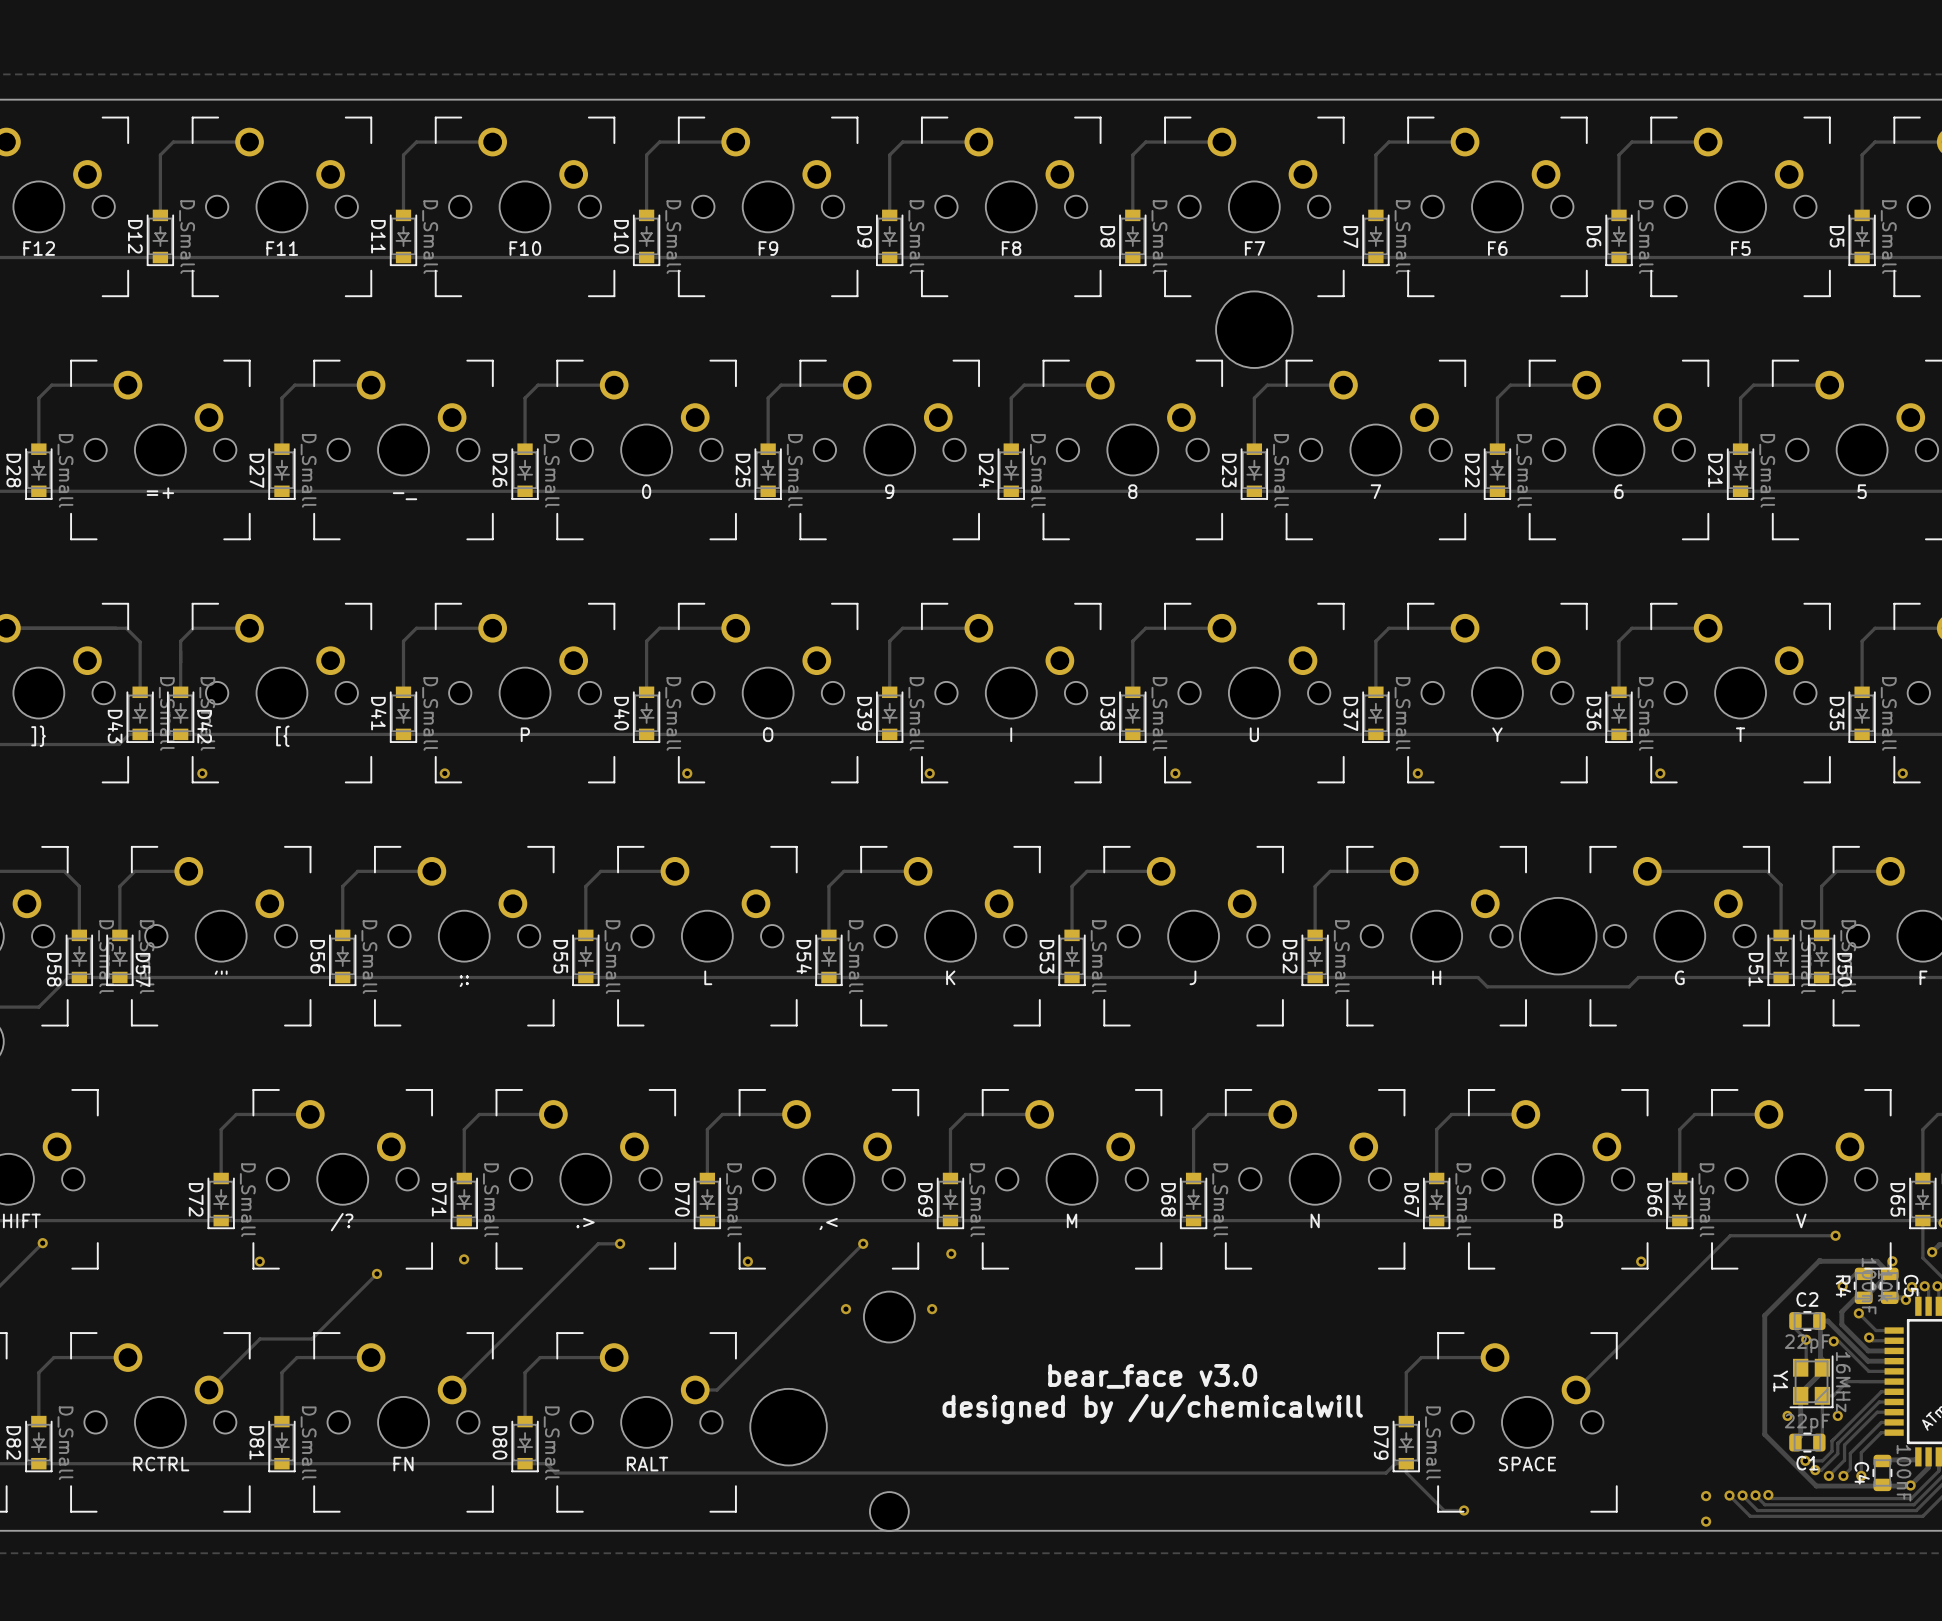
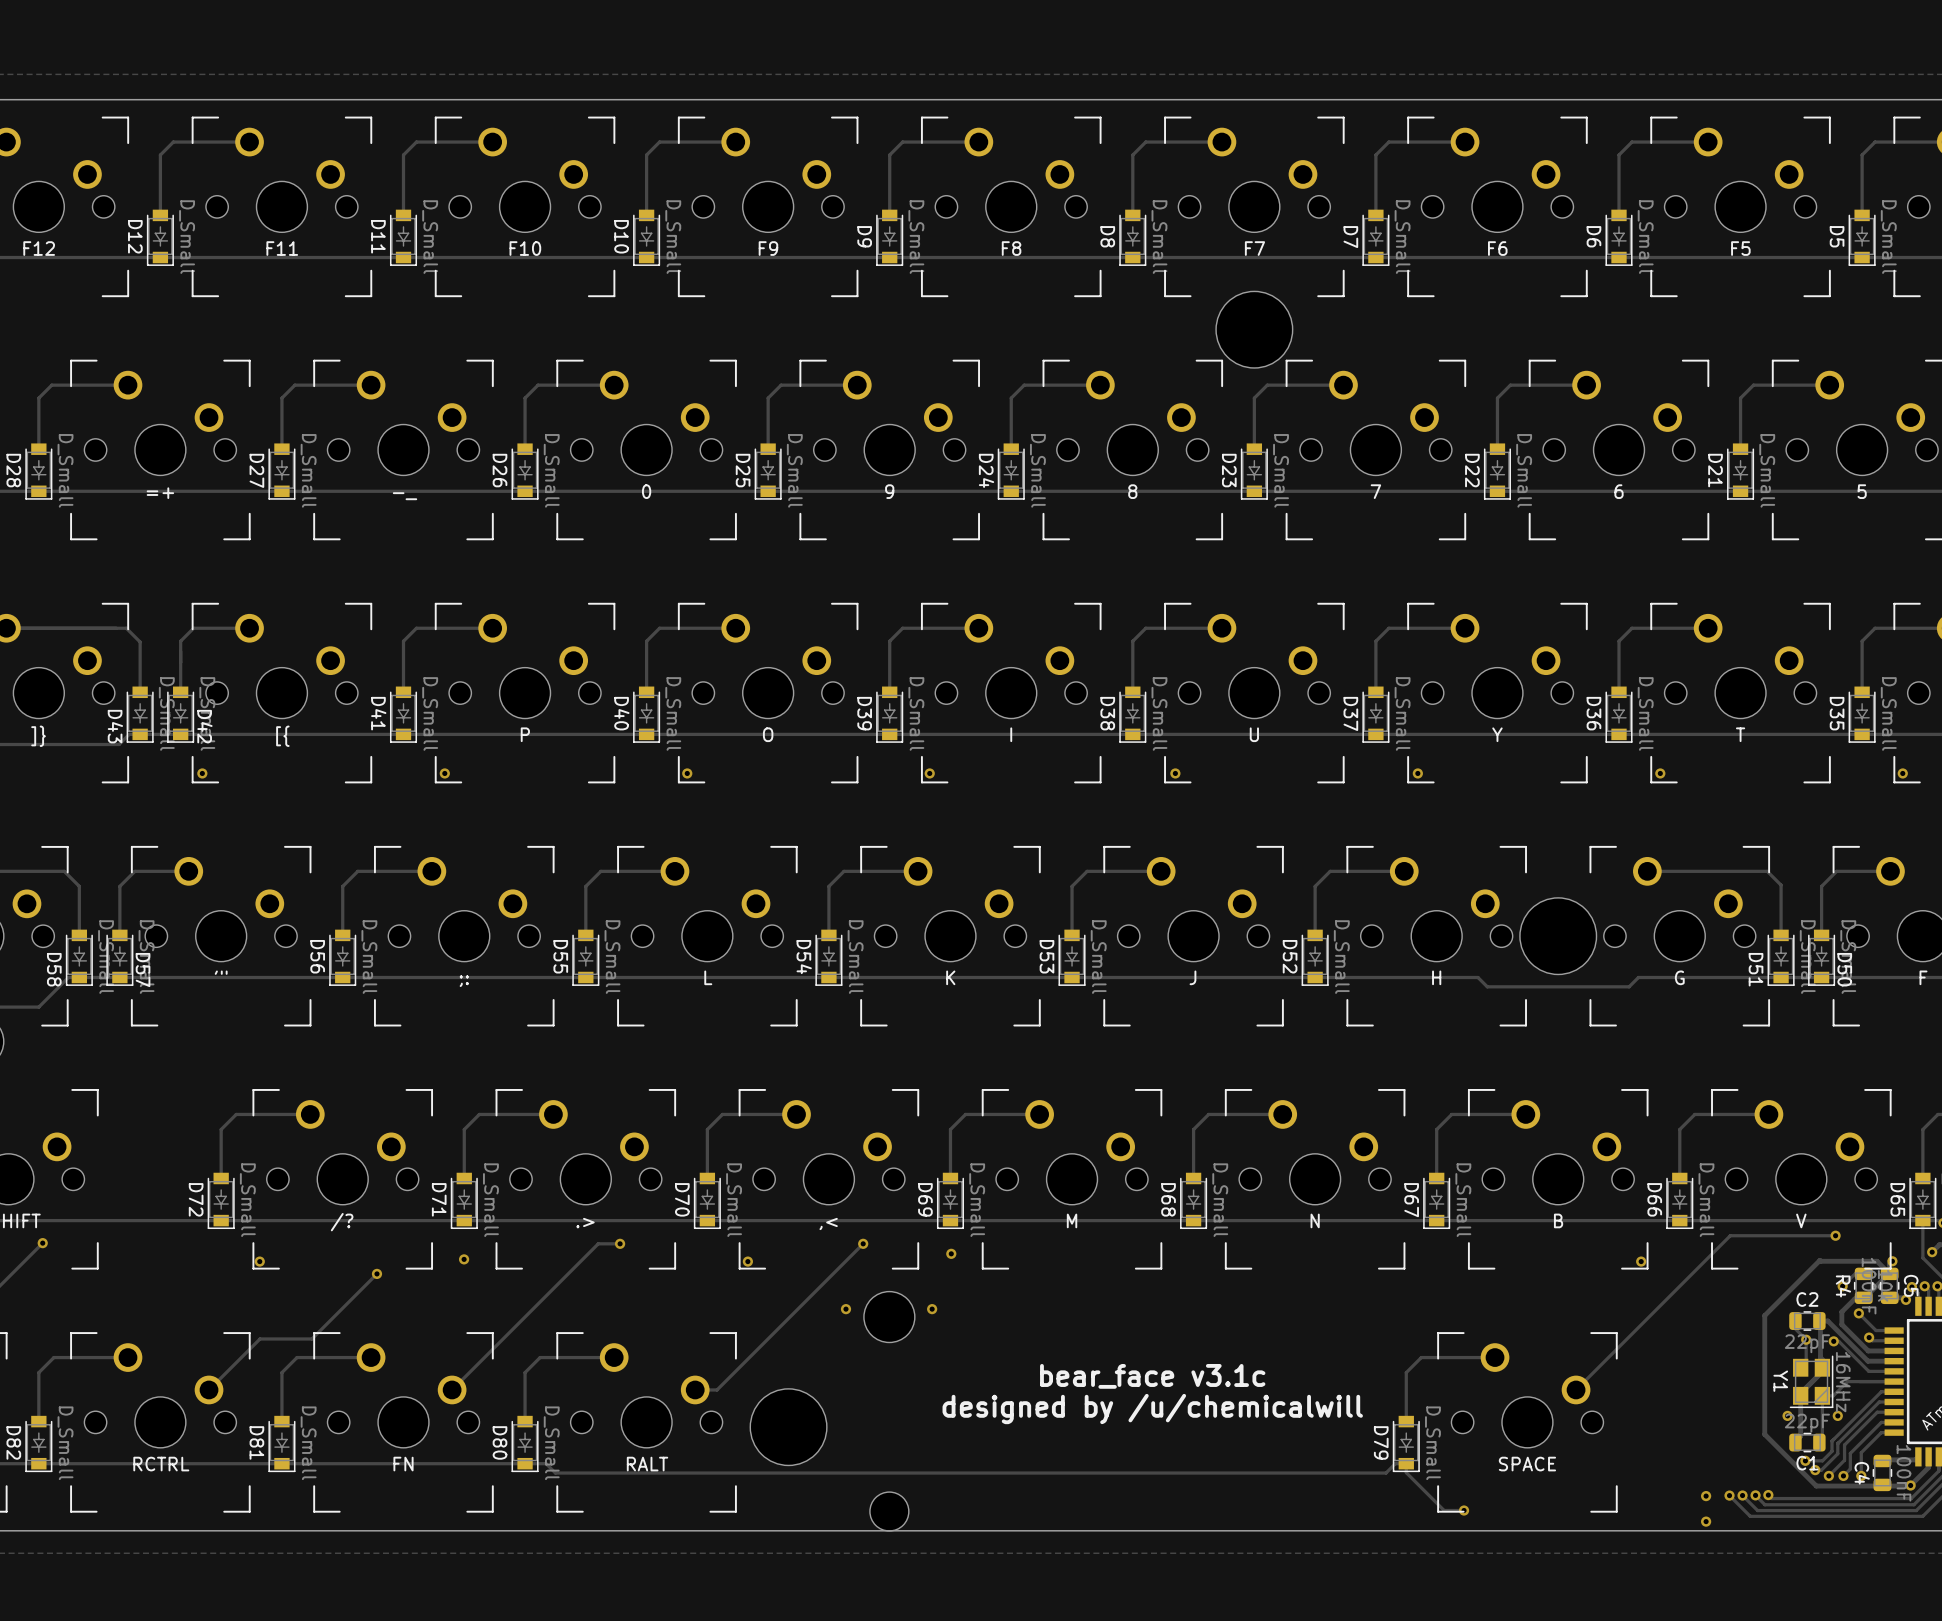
text: bear_face v3.0 (1152, 1376) -> bear_face v3.1c (1152, 1376)

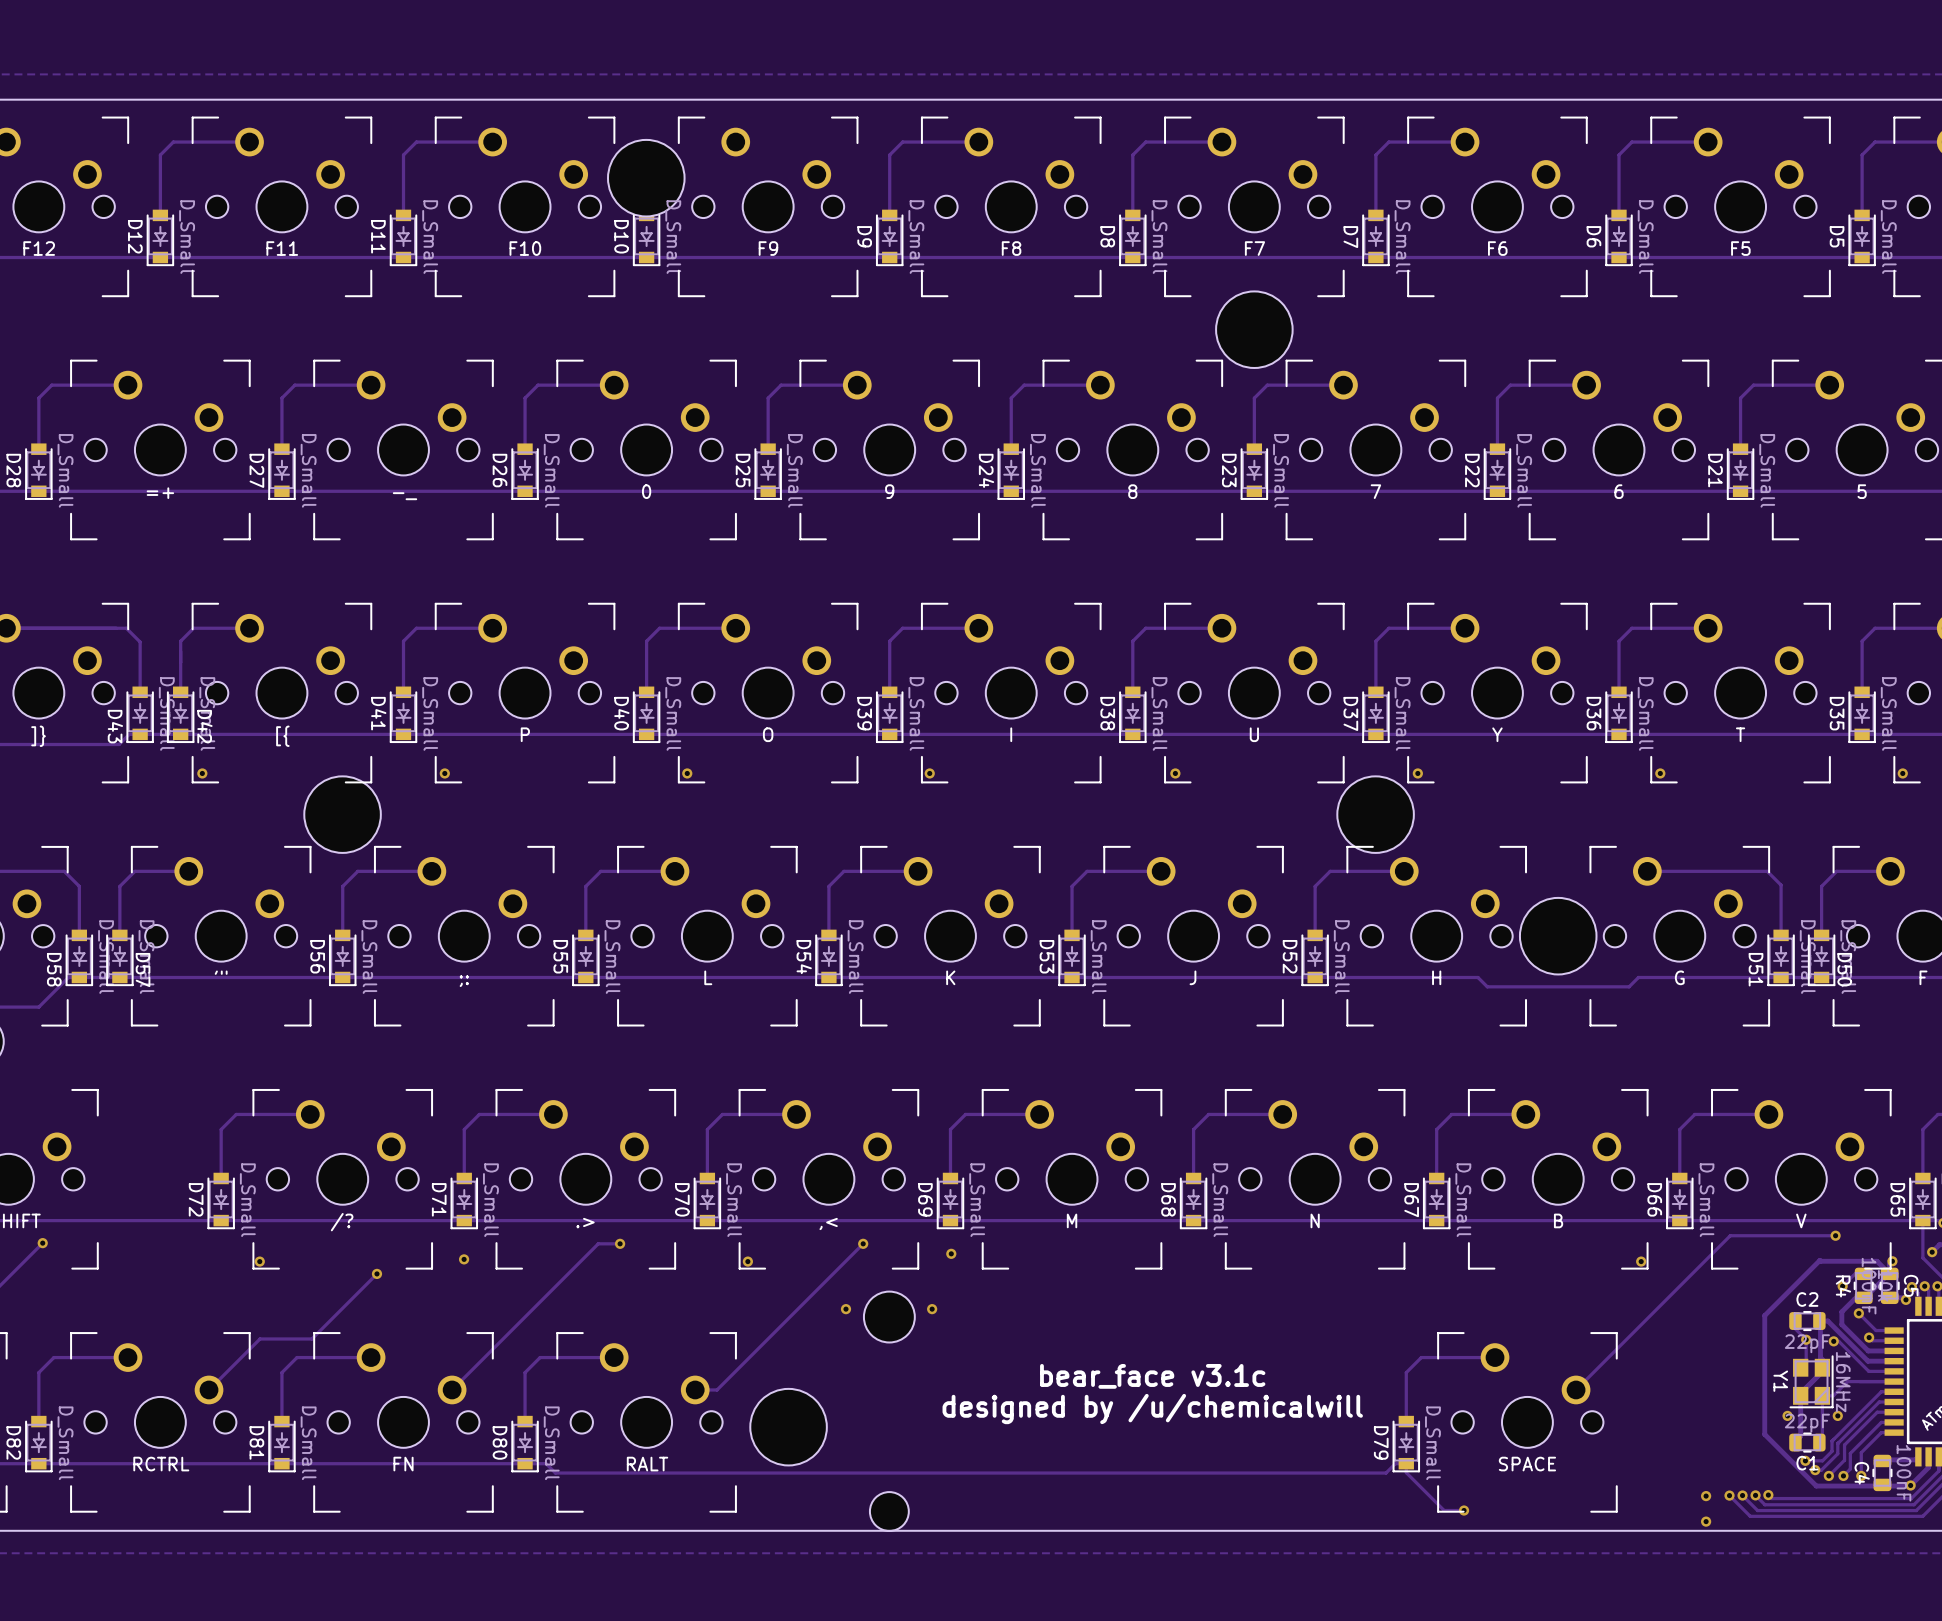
track: (728, 142) (659, 142) (646, 155) (646, 215) -> none
part: none -> (646, 178)
part: none -> (342, 814)
part: none -> (1375, 814)

